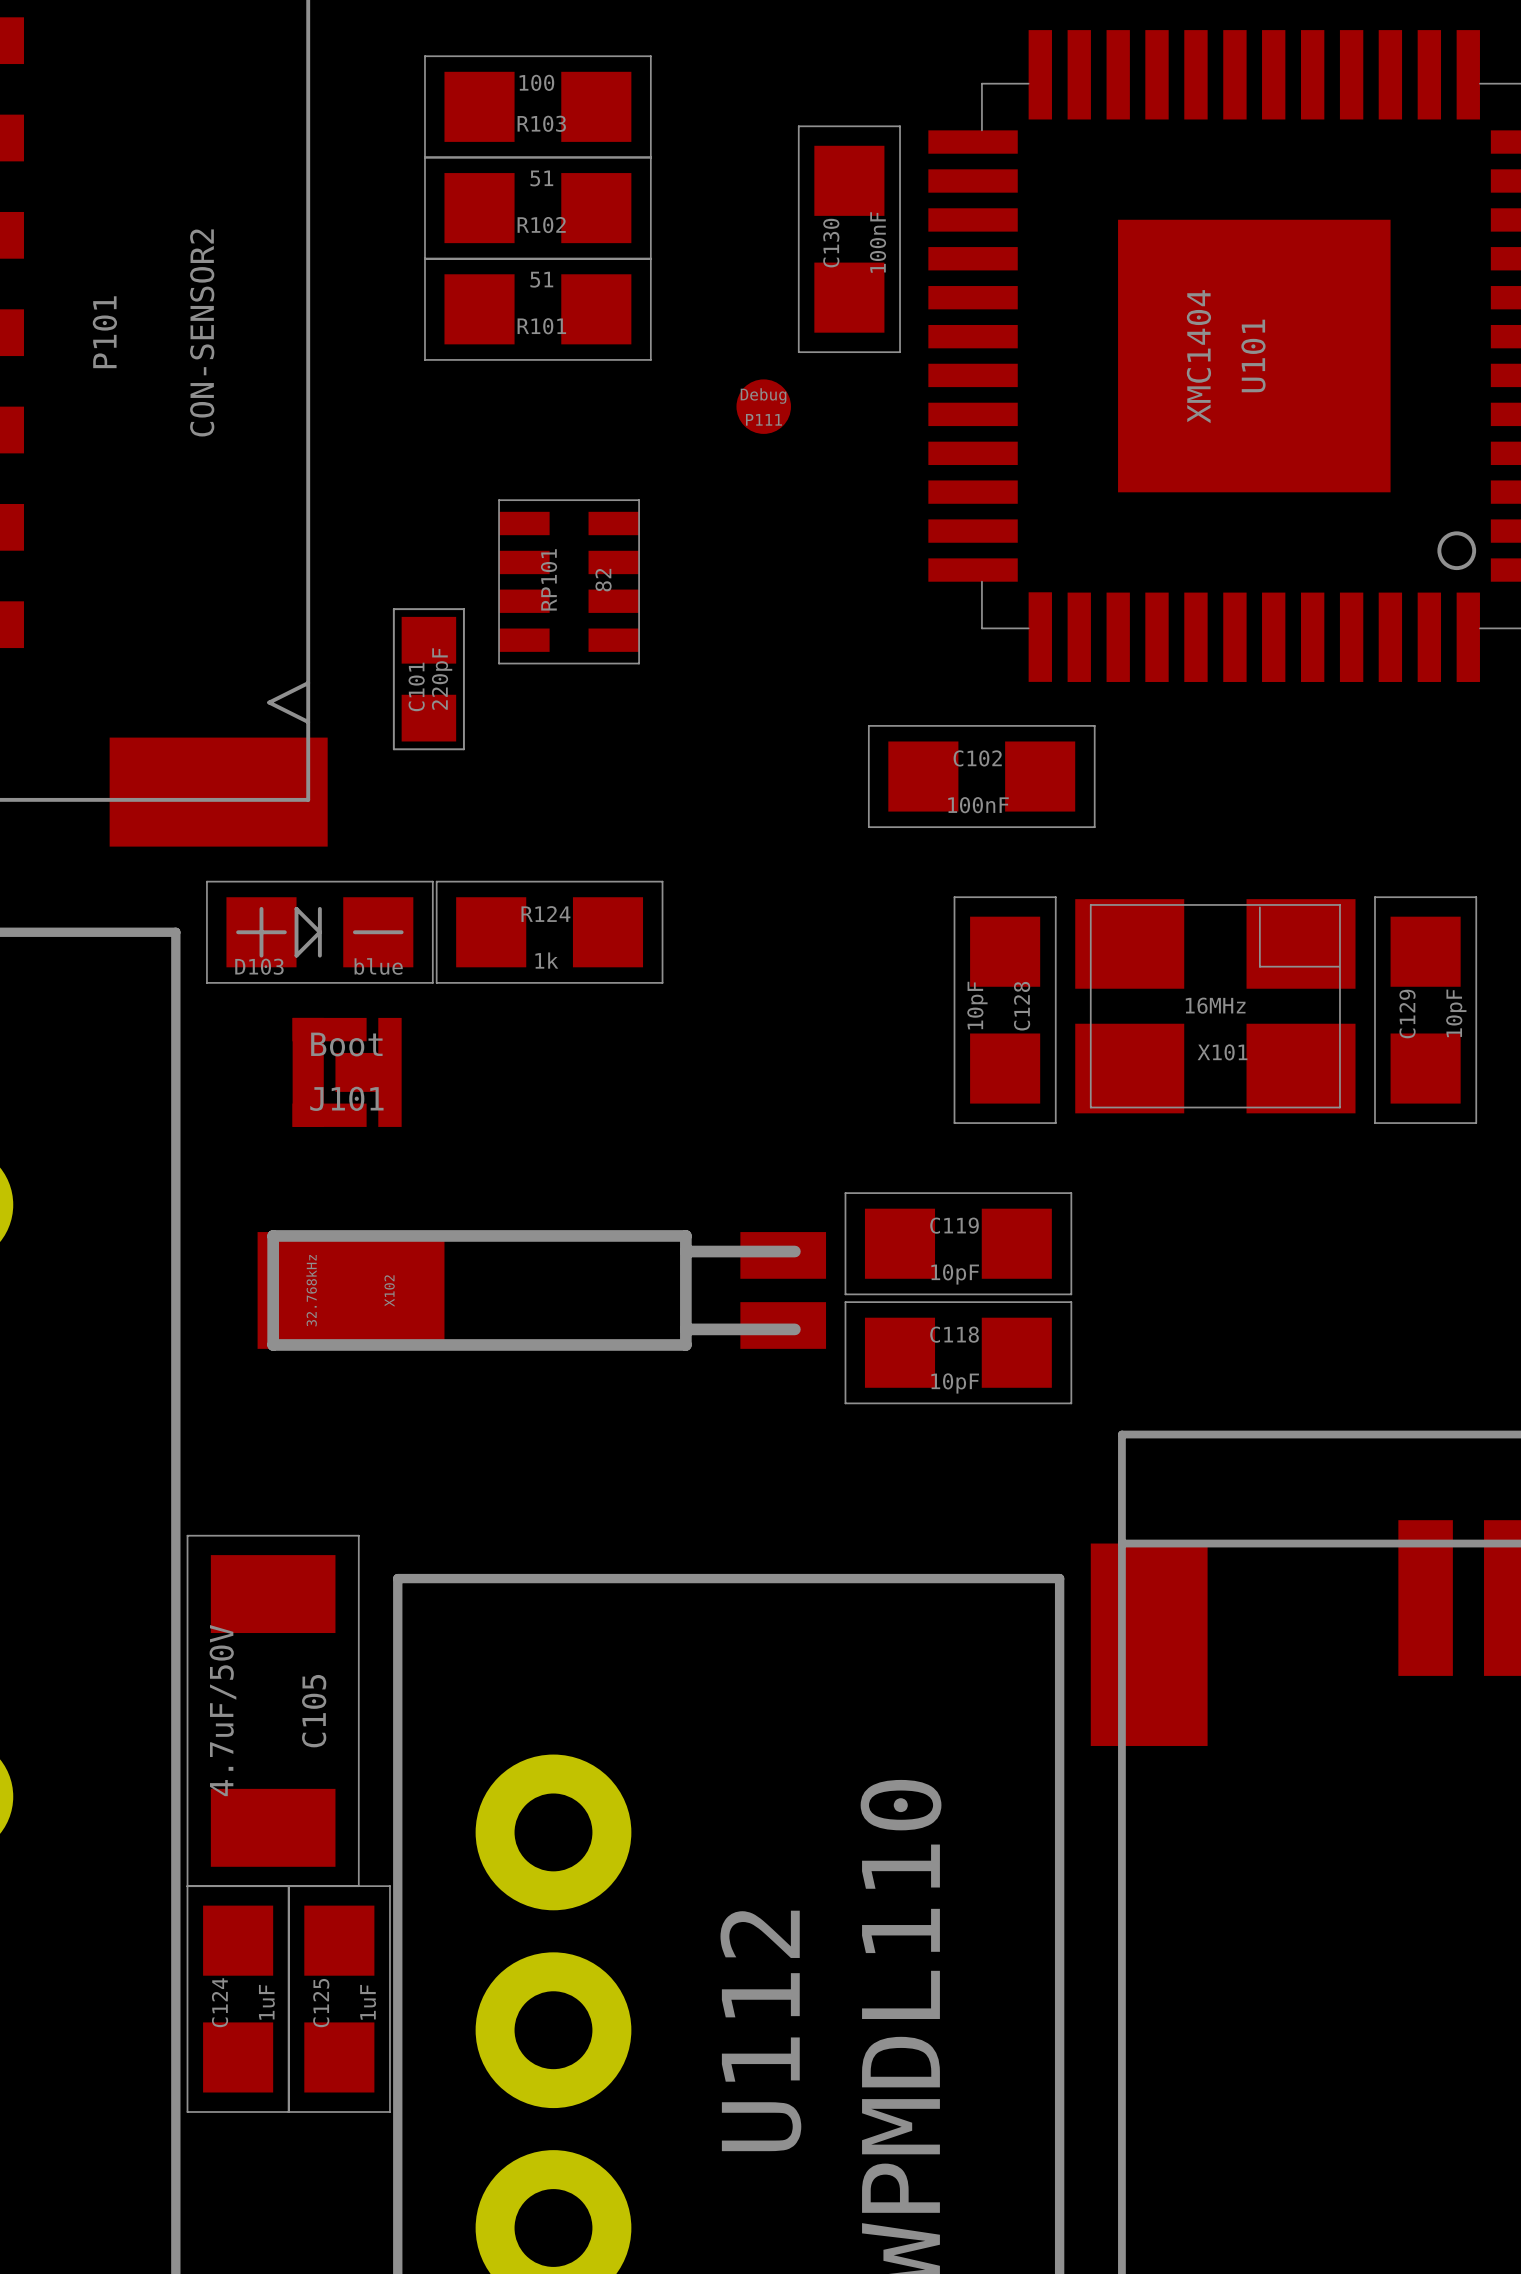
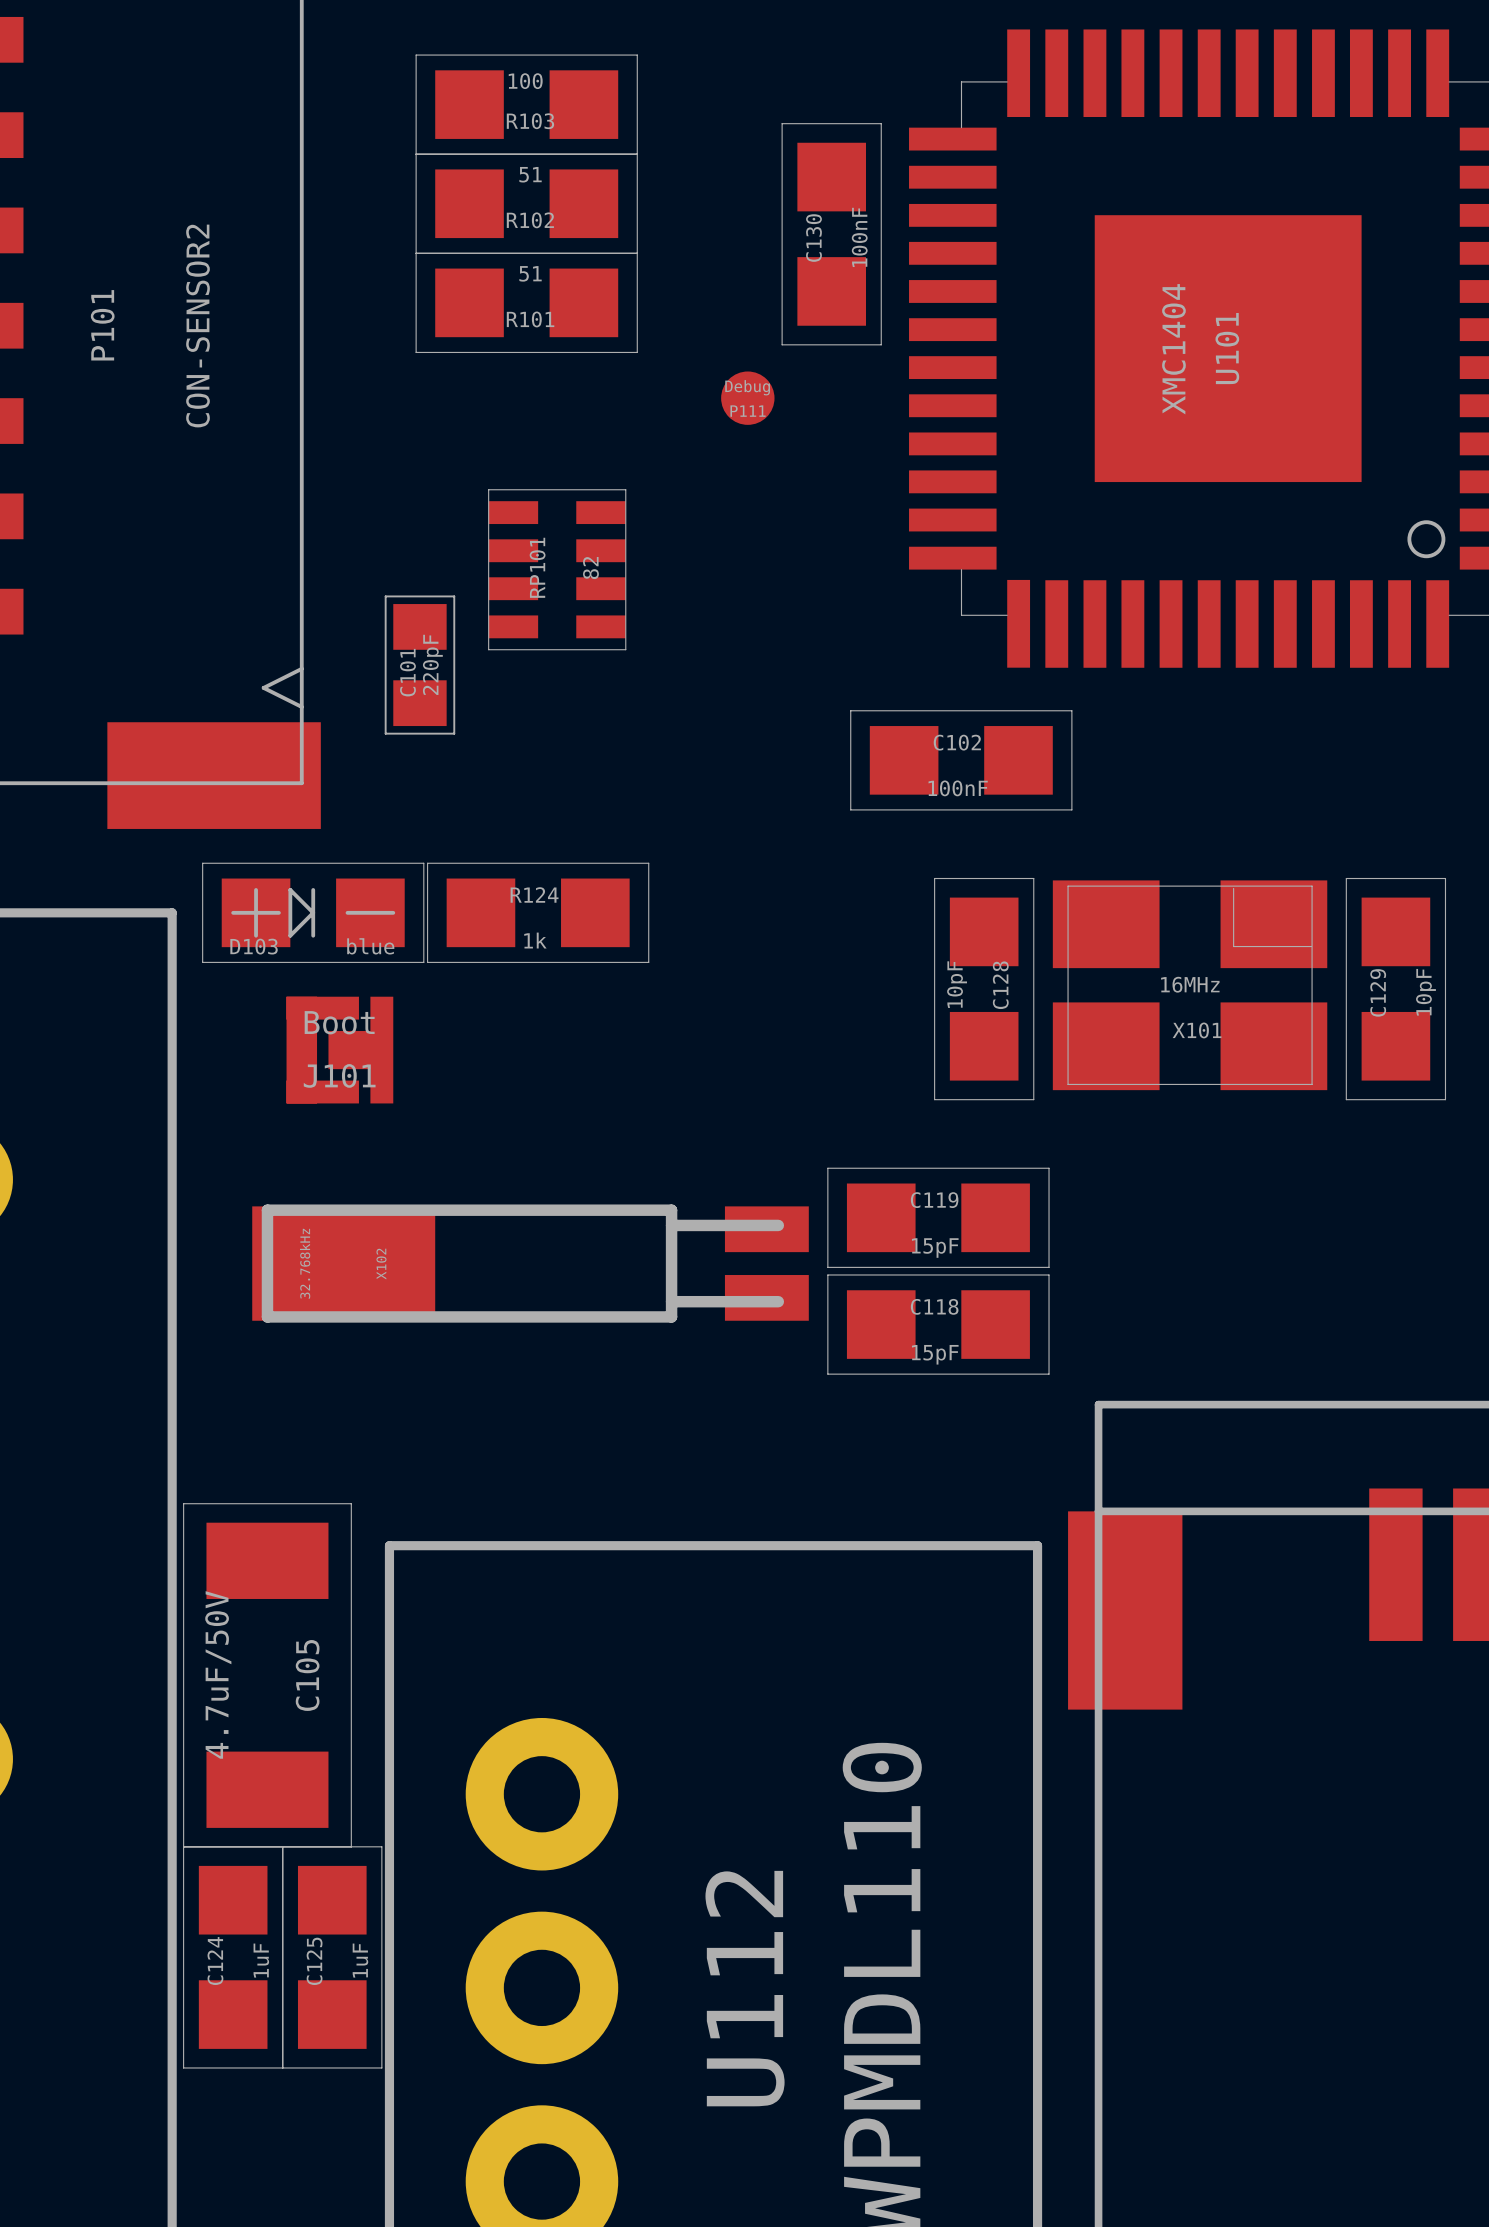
C119 value: 10pF (955, 1274) -> 15pF (935, 1248)
C118 value: 10pF (955, 1383) -> 15pF (935, 1354)

